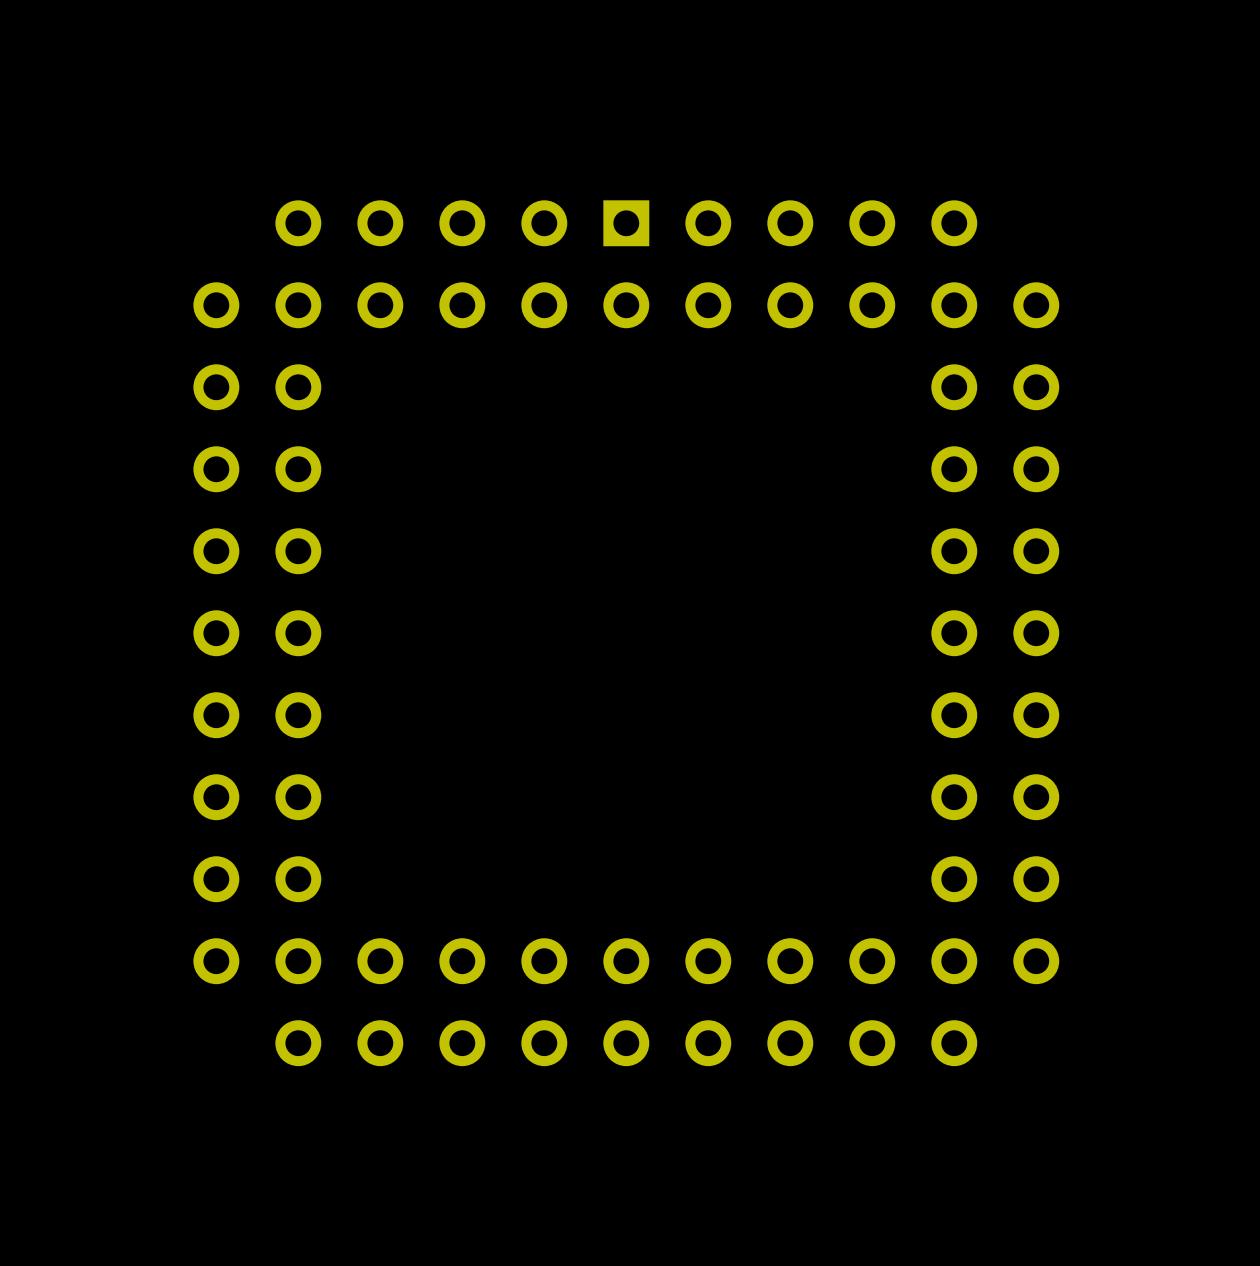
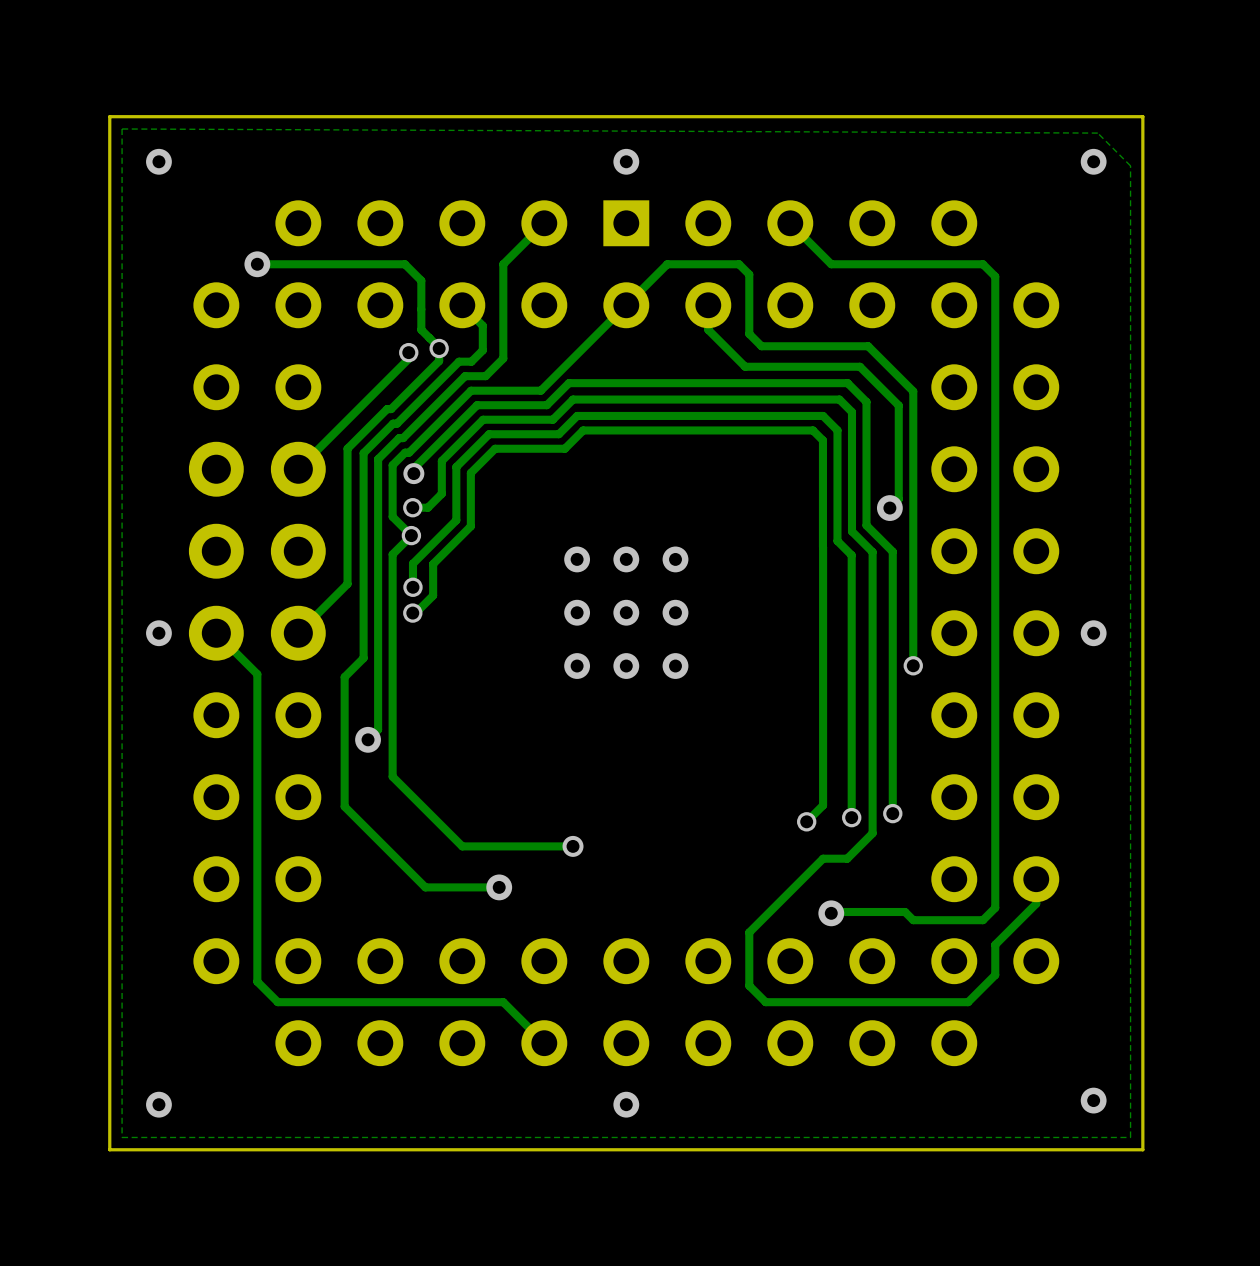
board edge: none -> (1142, 116) (109, 116) (109, 1149) (1142, 1149) (1142, 116)
zone outline: none -> (122, 128) (1097, 133) (1130, 165) (1130, 1137) (122, 1137) (122, 128)
via: none -> (158, 161)
via: none -> (626, 161)
via: none -> (1093, 161)
part footprint: [193, 200, 1060, 1067] -> [193, 200, 1060, 1067]
track: none -> (544, 223) (503, 264) (503, 358) (485, 376) (465, 376) (403, 438) (399, 438) (378, 459) (378, 729) (368, 739)
track: none -> (790, 223) (831, 264) (982, 264) (995, 276) (995, 907) (982, 920) (913, 920) (905, 912) (831, 913)
track: none -> (257, 264) (404, 264) (421, 280) (421, 329) (439, 347) (439, 361) (391, 409) (387, 409) (347, 448) (347, 584) (298, 633)
via: none -> (257, 264)
track: none -> (462, 305) (482, 325) (482, 350) (471, 361) (459, 361) (397, 423) (393, 423) (363, 453) (363, 658) (344, 677) (344, 806) (425, 887) (499, 887)
track: none -> (708, 305) (708, 329) (745, 366) (859, 366) (898, 405) (898, 499) (889, 508)
via: none -> (439, 348)
via: none -> (408, 352)
track: none -> (409, 353) (408, 358) (298, 469) (314, 469)
track: none -> (413, 473) (413, 468) (477, 405) (546, 405) (568, 383) (847, 383) (866, 401) (866, 525) (892, 551) (892, 813)
via: none -> (413, 473)
track: none -> (412, 507) (427, 507) (441, 493) (441, 461) (483, 419) (552, 419) (573, 399) (839, 399) (851, 412) (851, 531) (872, 552) (872, 833) (847, 858) (823, 858) (749, 932) (749, 985) (765, 1002) (968, 1002) (995, 975) (995, 944) (1036, 903) (1036, 879)
via: none -> (412, 507)
via: none -> (889, 508)
via: none -> (411, 535)
track: none -> (822, 547) (822, 440) (812, 430) (583, 430) (564, 448) (495, 448) (470, 473) (470, 526) (433, 564) (433, 595) (415, 613) (412, 613)
track: none -> (823, 547) (823, 805) (806, 821)
part: none -> (257, 551)
via: none -> (577, 559)
via: none -> (626, 559)
via: none -> (675, 559)
track: none -> (412, 587) (412, 563) (456, 520) (456, 467) (489, 434) (558, 434) (577, 415) (823, 415) (837, 430) (837, 541) (851, 555) (851, 817)
via: none -> (412, 587)
via: none -> (577, 612)
via: none -> (626, 612)
via: none -> (675, 612)
via: none -> (412, 613)
via: none -> (158, 633)
track: none -> (216, 633) (257, 674) (257, 981) (277, 1002) (503, 1002) (544, 1043)
via: none -> (1093, 633)
track: none -> (913, 665) (913, 391) (868, 346) (761, 346) (749, 333) (749, 274) (739, 264) (667, 264) (540, 390) (471, 390) (409, 452) (405, 452) (392, 465) (392, 516) (411, 535) (392, 554) (392, 776) (462, 846) (573, 846)
via: none -> (913, 665)
via: none -> (577, 666)
via: none -> (626, 666)
via: none -> (675, 666)
via: none -> (368, 739)
via: none -> (892, 813)
via: none -> (851, 817)
via: none -> (806, 821)
via: none -> (573, 846)
via: none -> (499, 887)
via: none -> (831, 913)
via: none -> (1093, 1100)
via: none -> (158, 1104)
via: none -> (626, 1104)

